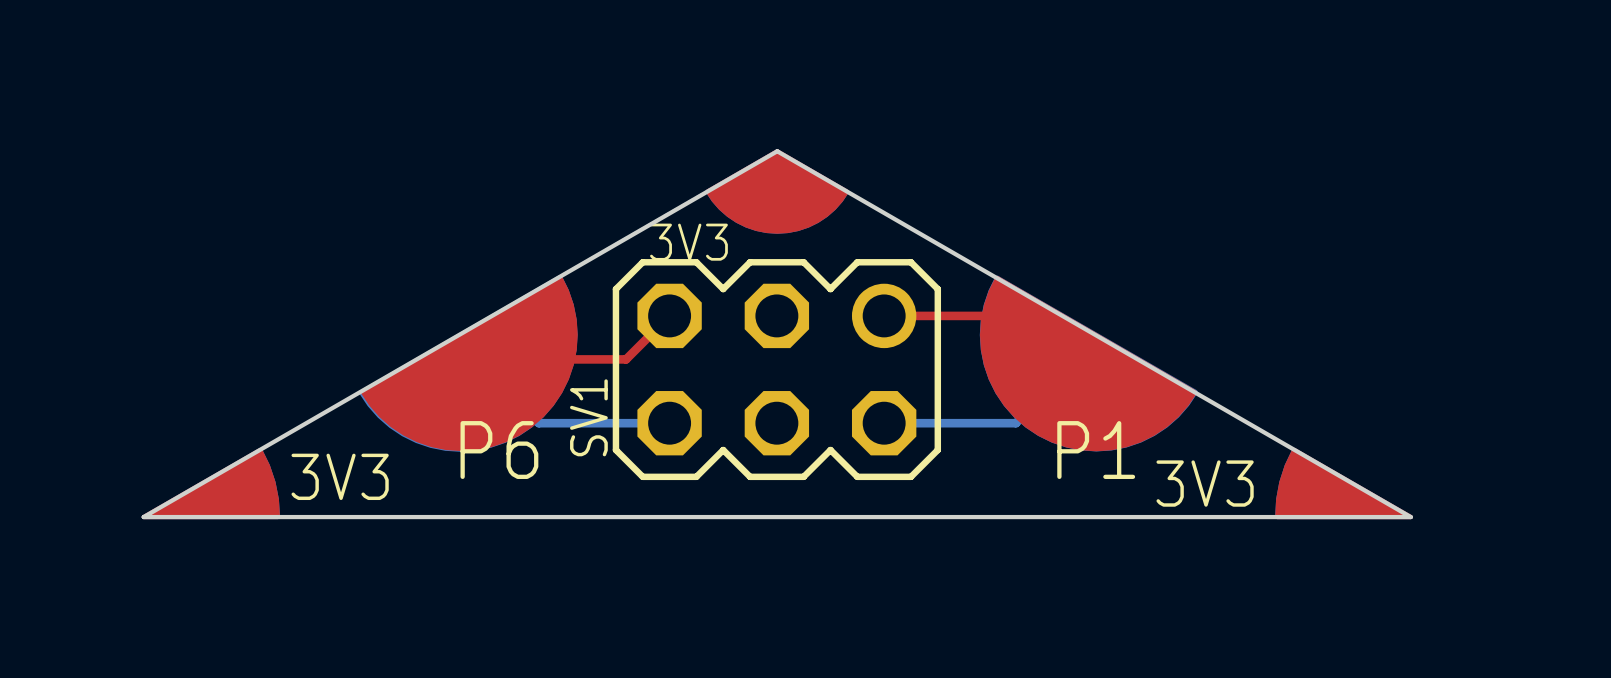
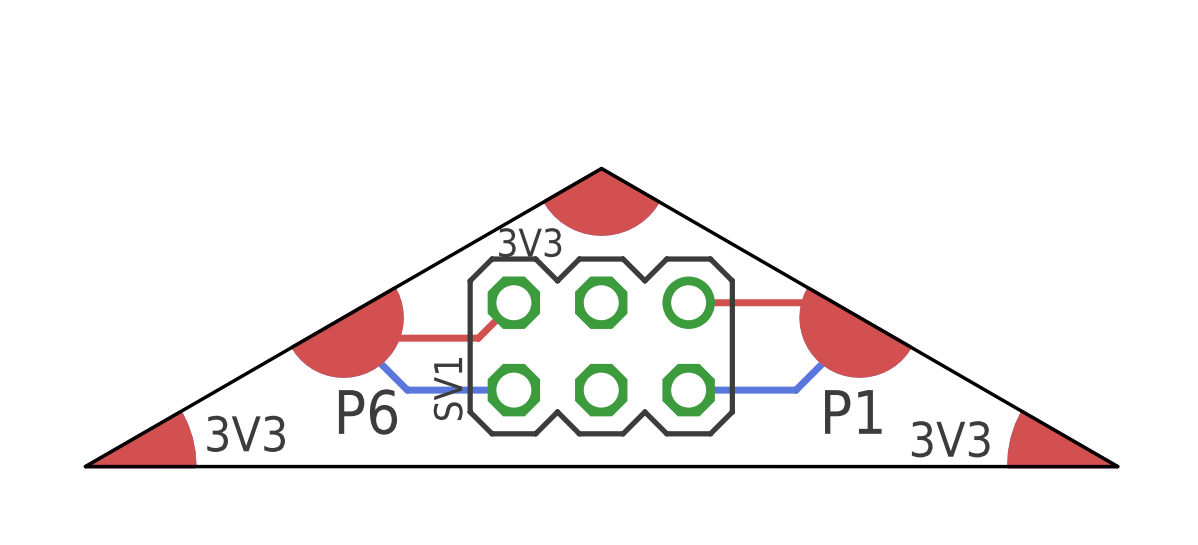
part footprint: [141, 149, 1413, 520] -> [83, 166, 1120, 469]

